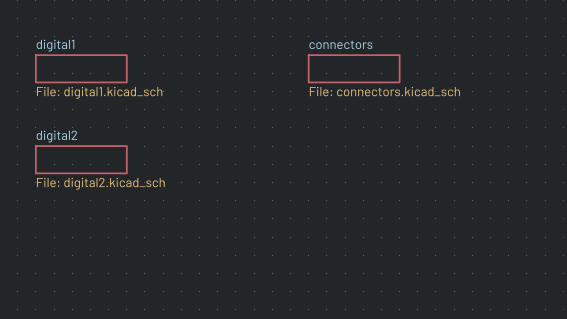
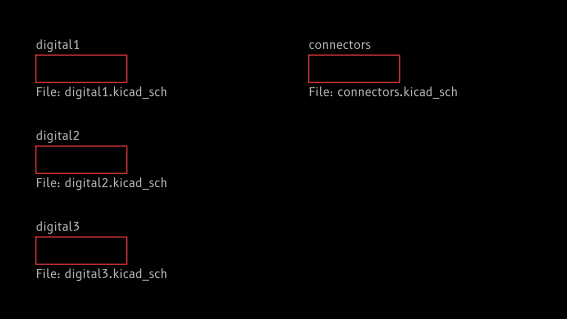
sheet digital3: none -> File: digital3.kicad_sch (81, 250)

